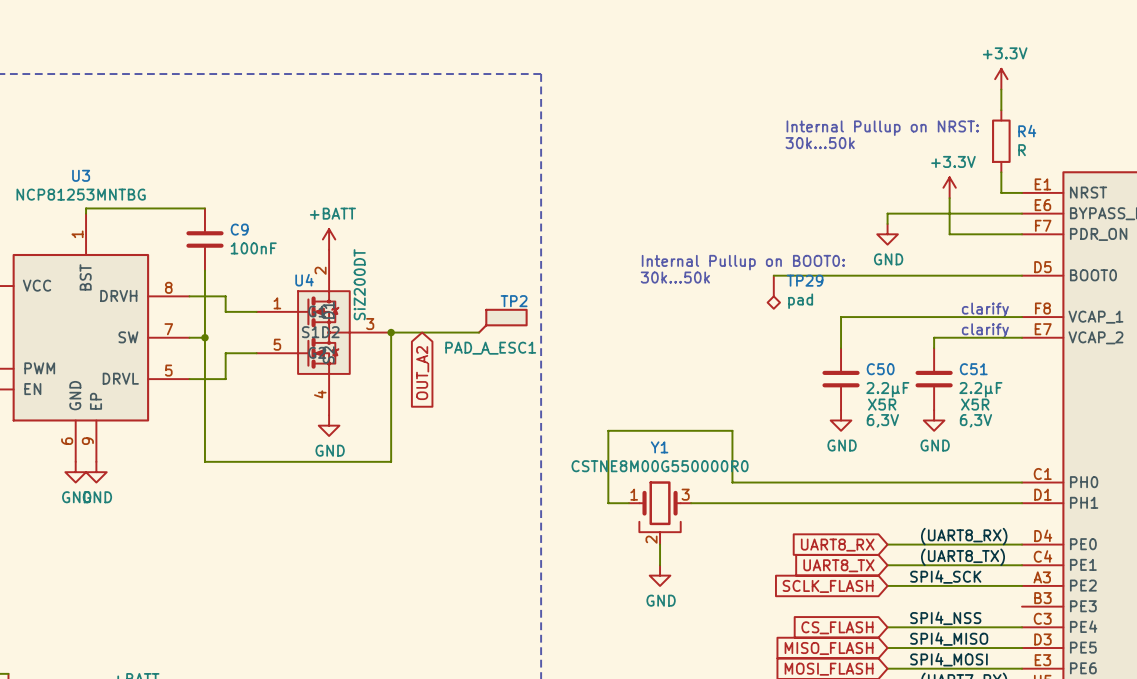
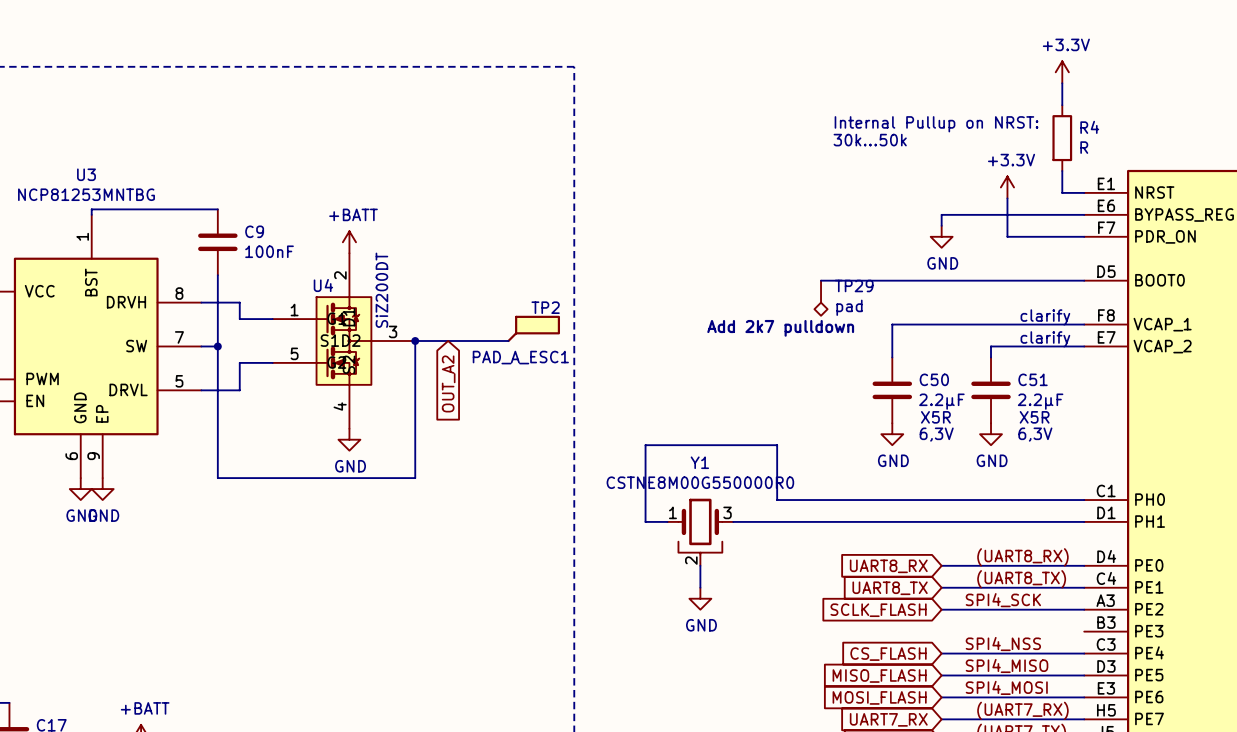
text: Internal Pullup on BOOT0: (743, 262) -> none
text: 30k...50k (675, 277) -> none
text: none -> Add 2k7 pulldown (780, 328)

